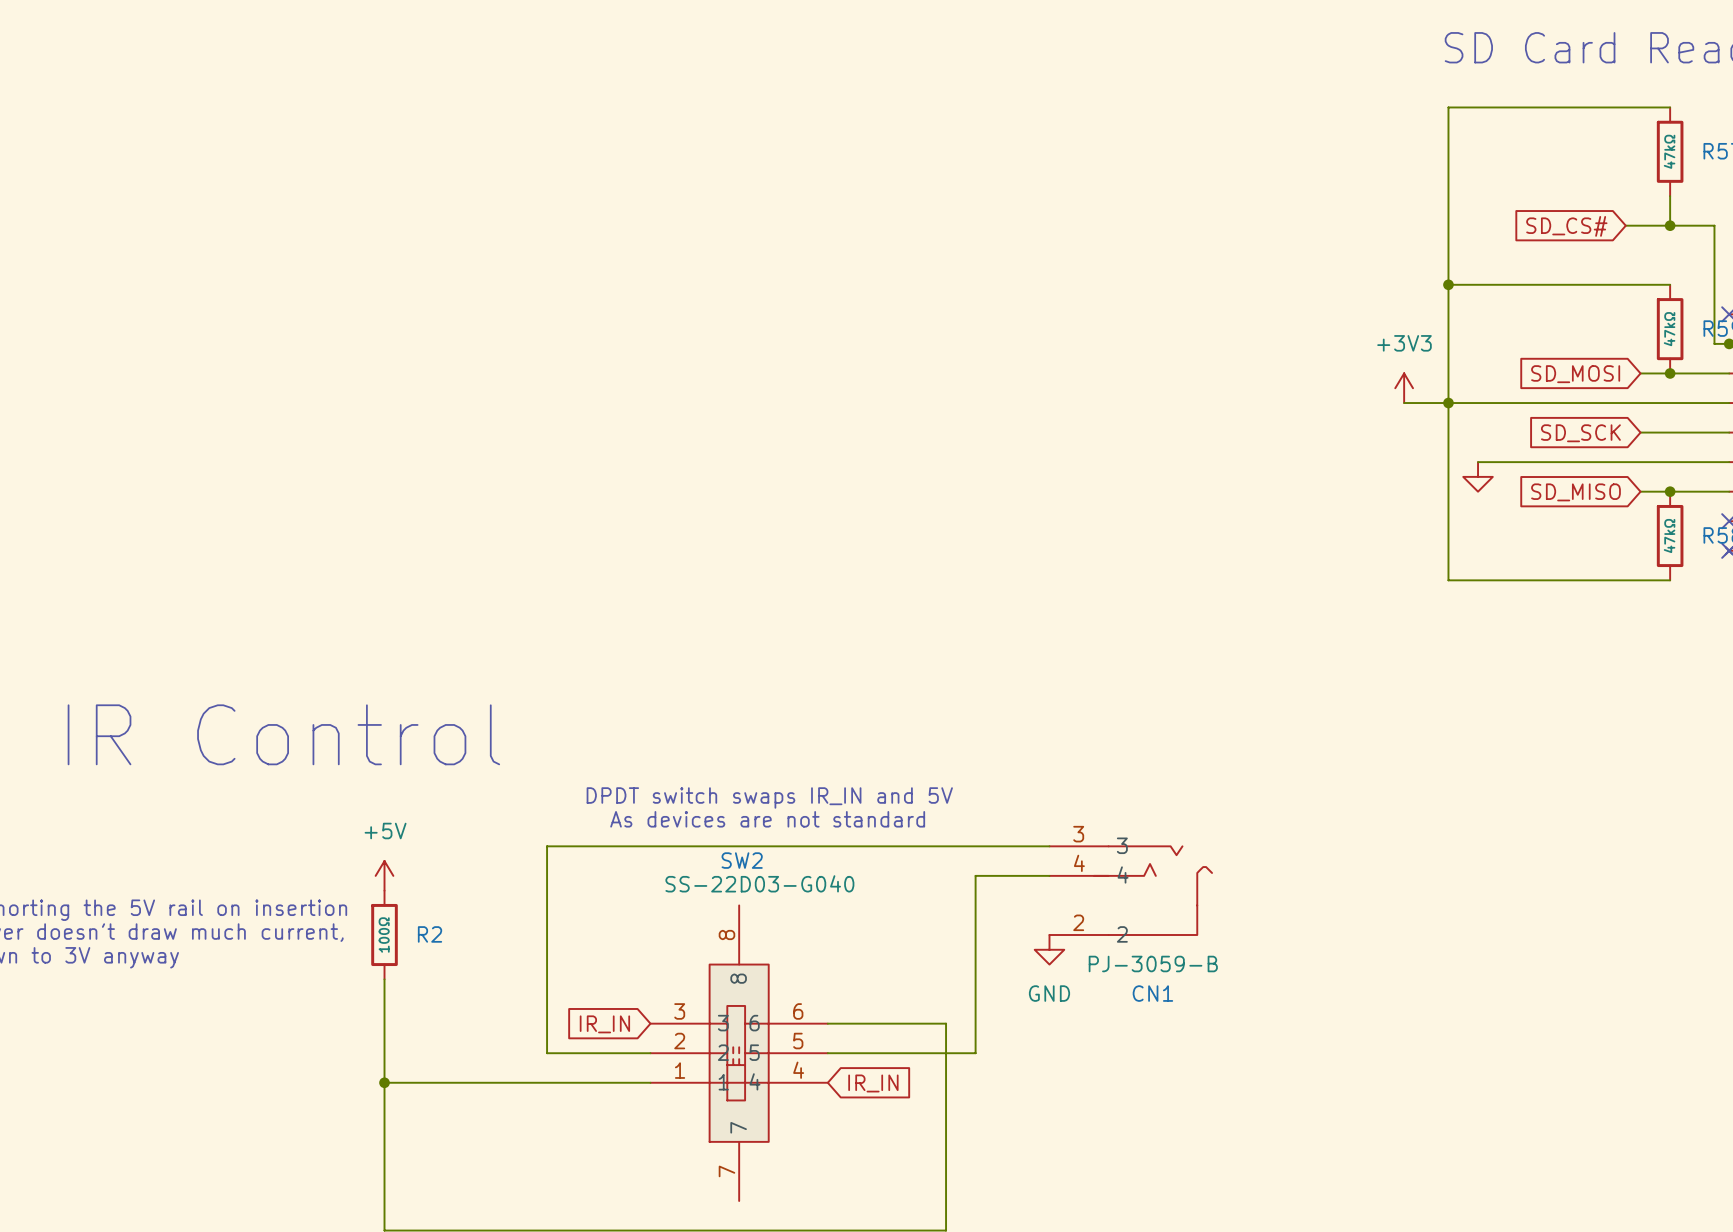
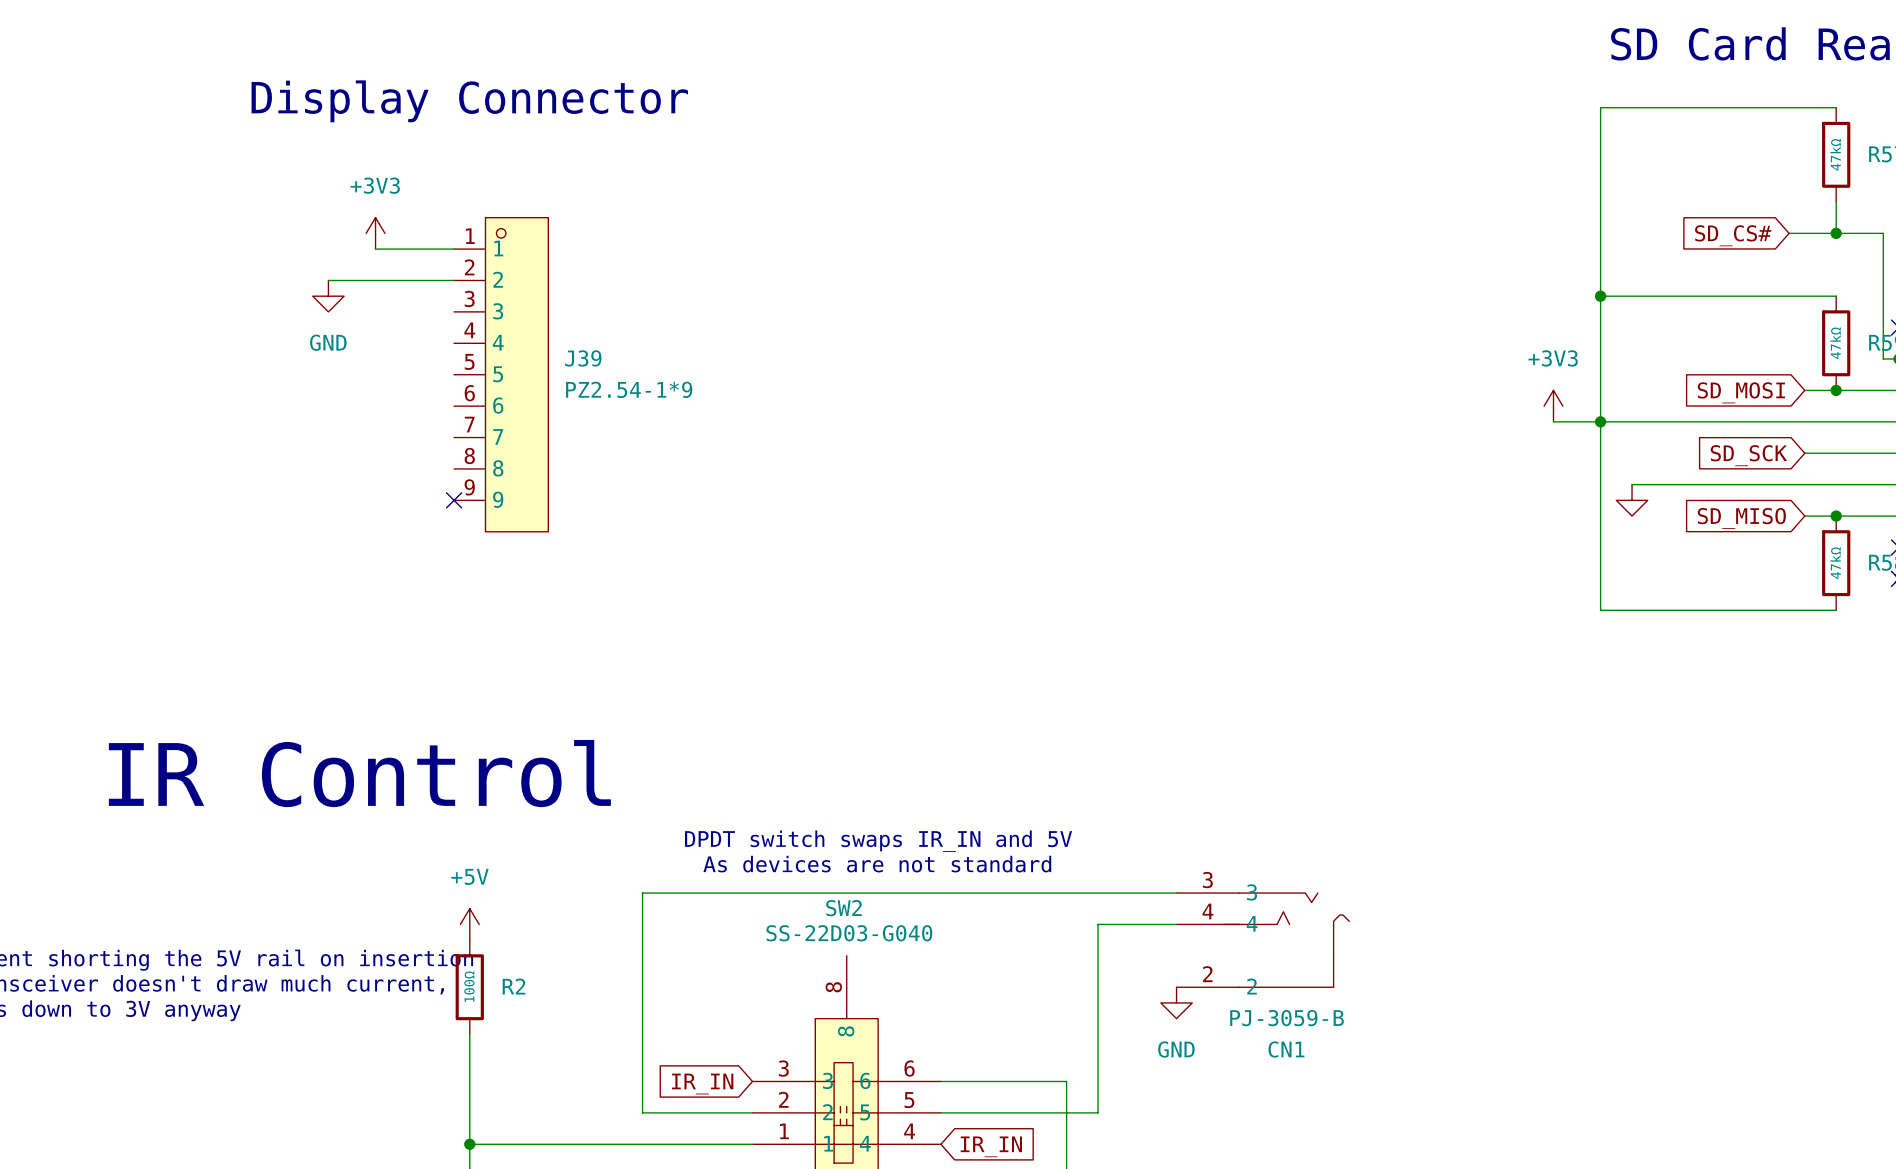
text: none -> Display Connector (469, 101)
power symbol: none -> +3V3 (375, 233)
wire: none -> (375, 249) (454, 249)
wire: none -> (328, 280) (454, 280)
power symbol: none -> GND (328, 296)
J39: none -> PZ2.54-1*9 (501, 374)
no-connect mark: none -> (454, 500)

